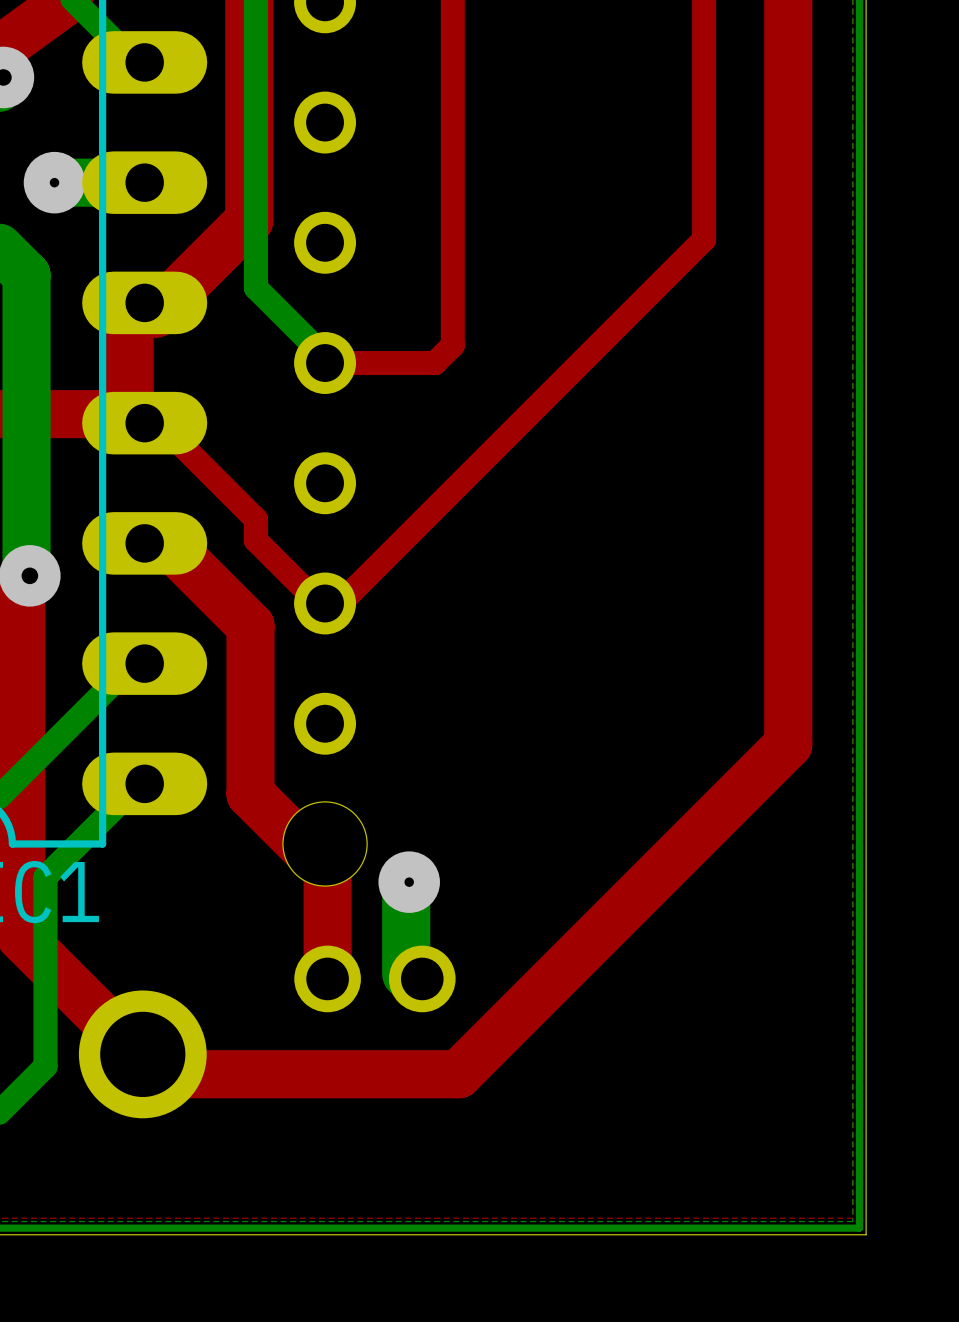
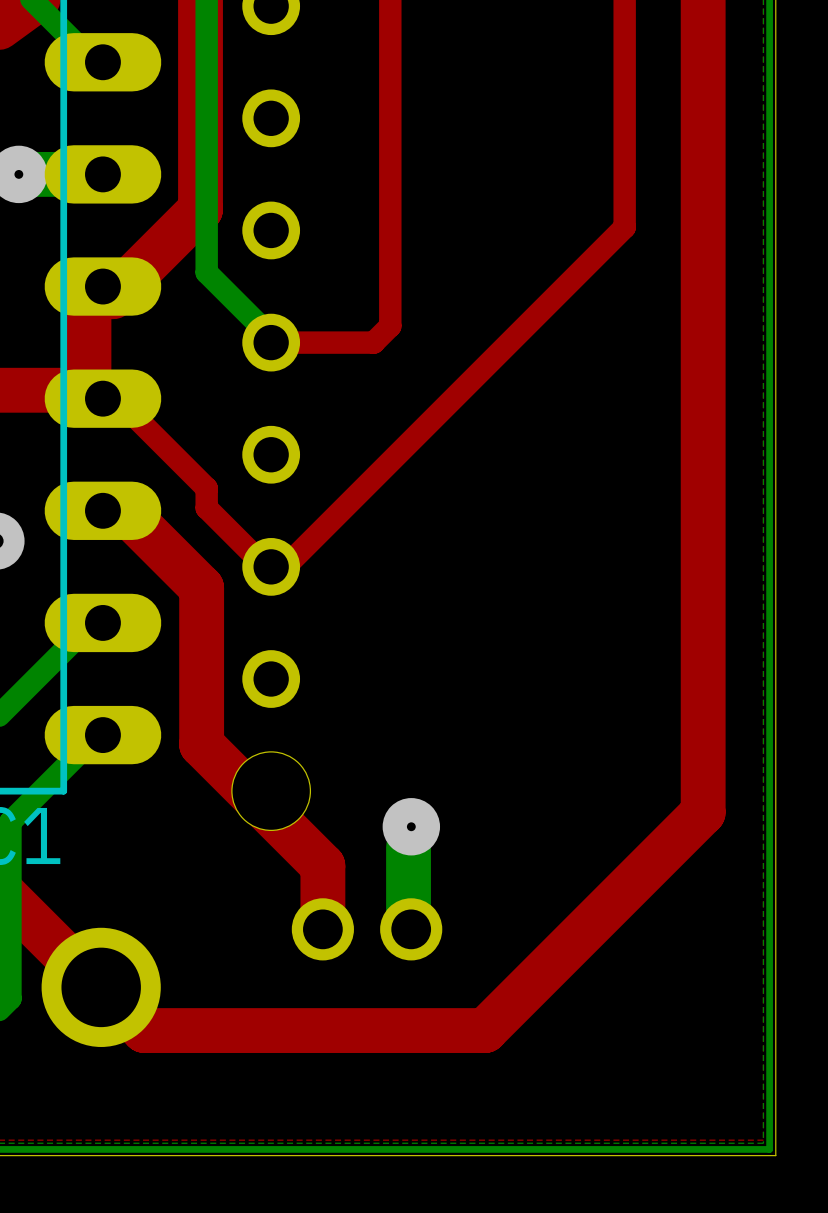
top track: (788, 744) (458, 1074) (162, 1074) -> (703, 698) (703, 812) (485, 1030) (144, 1030) (119, 1005)
top track: (327, 871) (327, 978) -> (273, 816) (322, 865) (322, 929)
via position: (409, 882) -> (411, 826)
bottom track: (406, 897) (406, 974) -> (408, 847) (408, 918)
part position: (374, 978) -> (367, 929)

